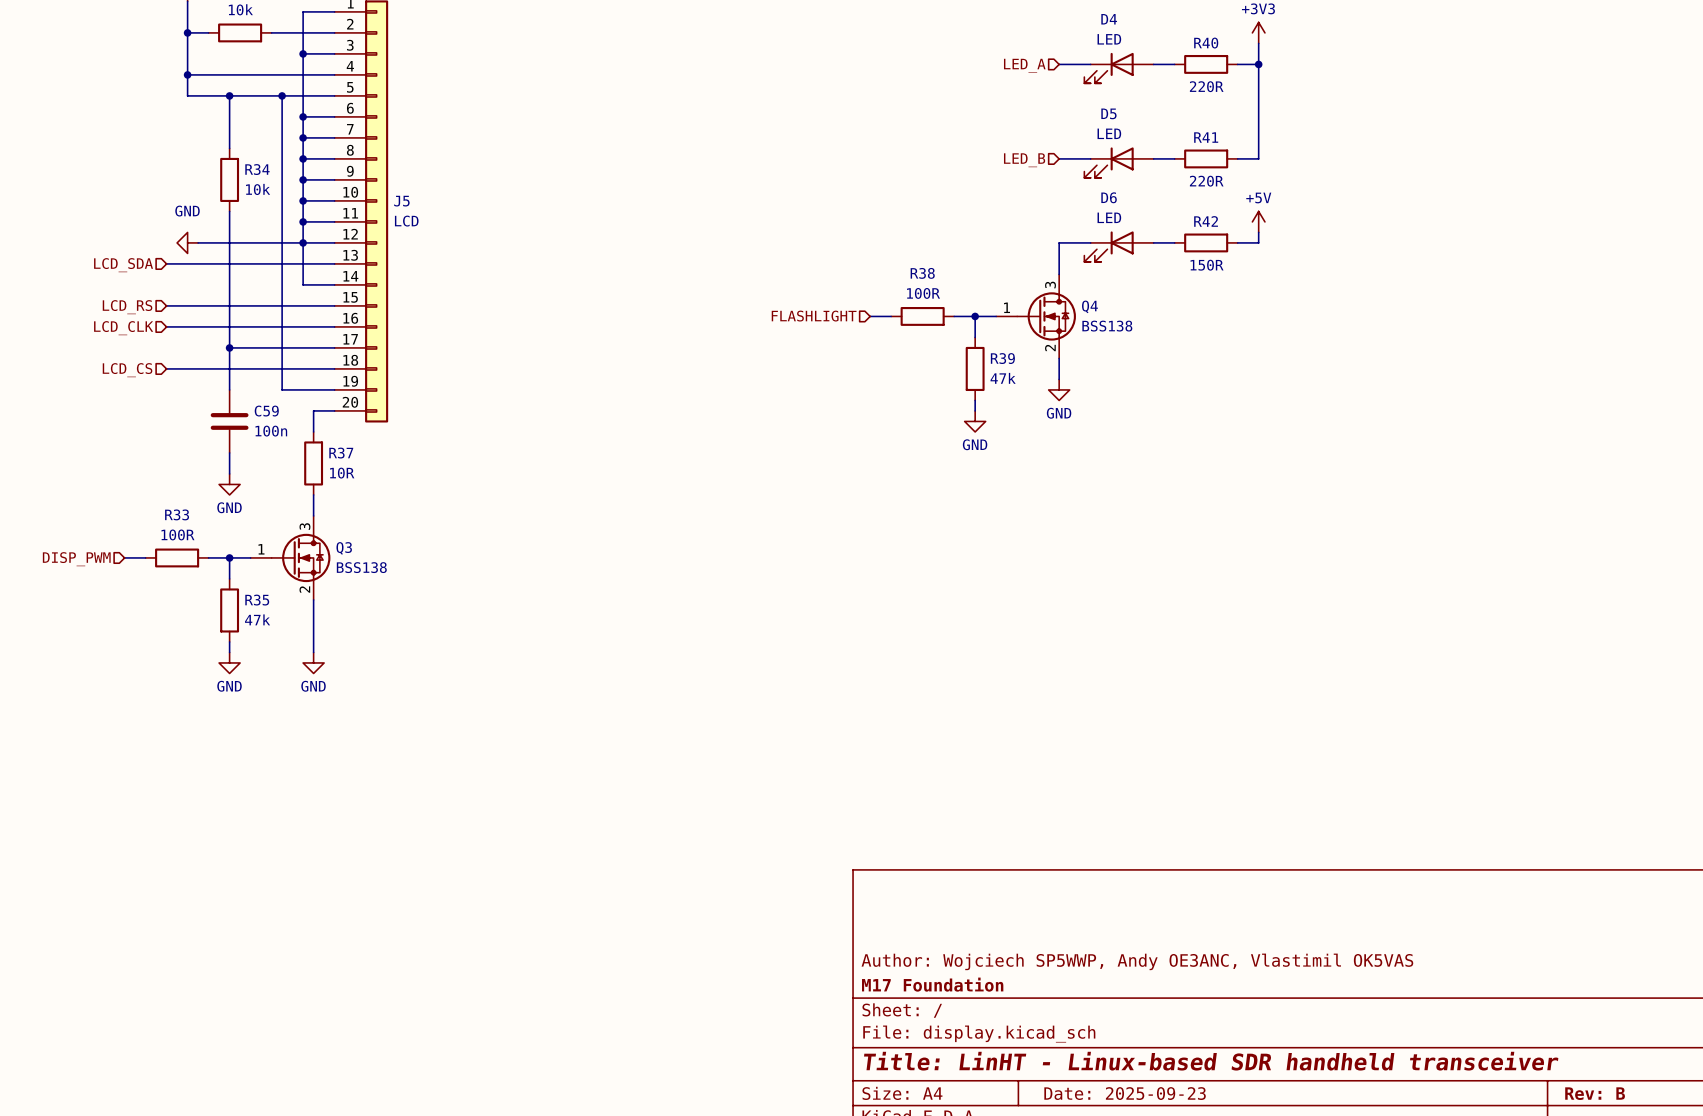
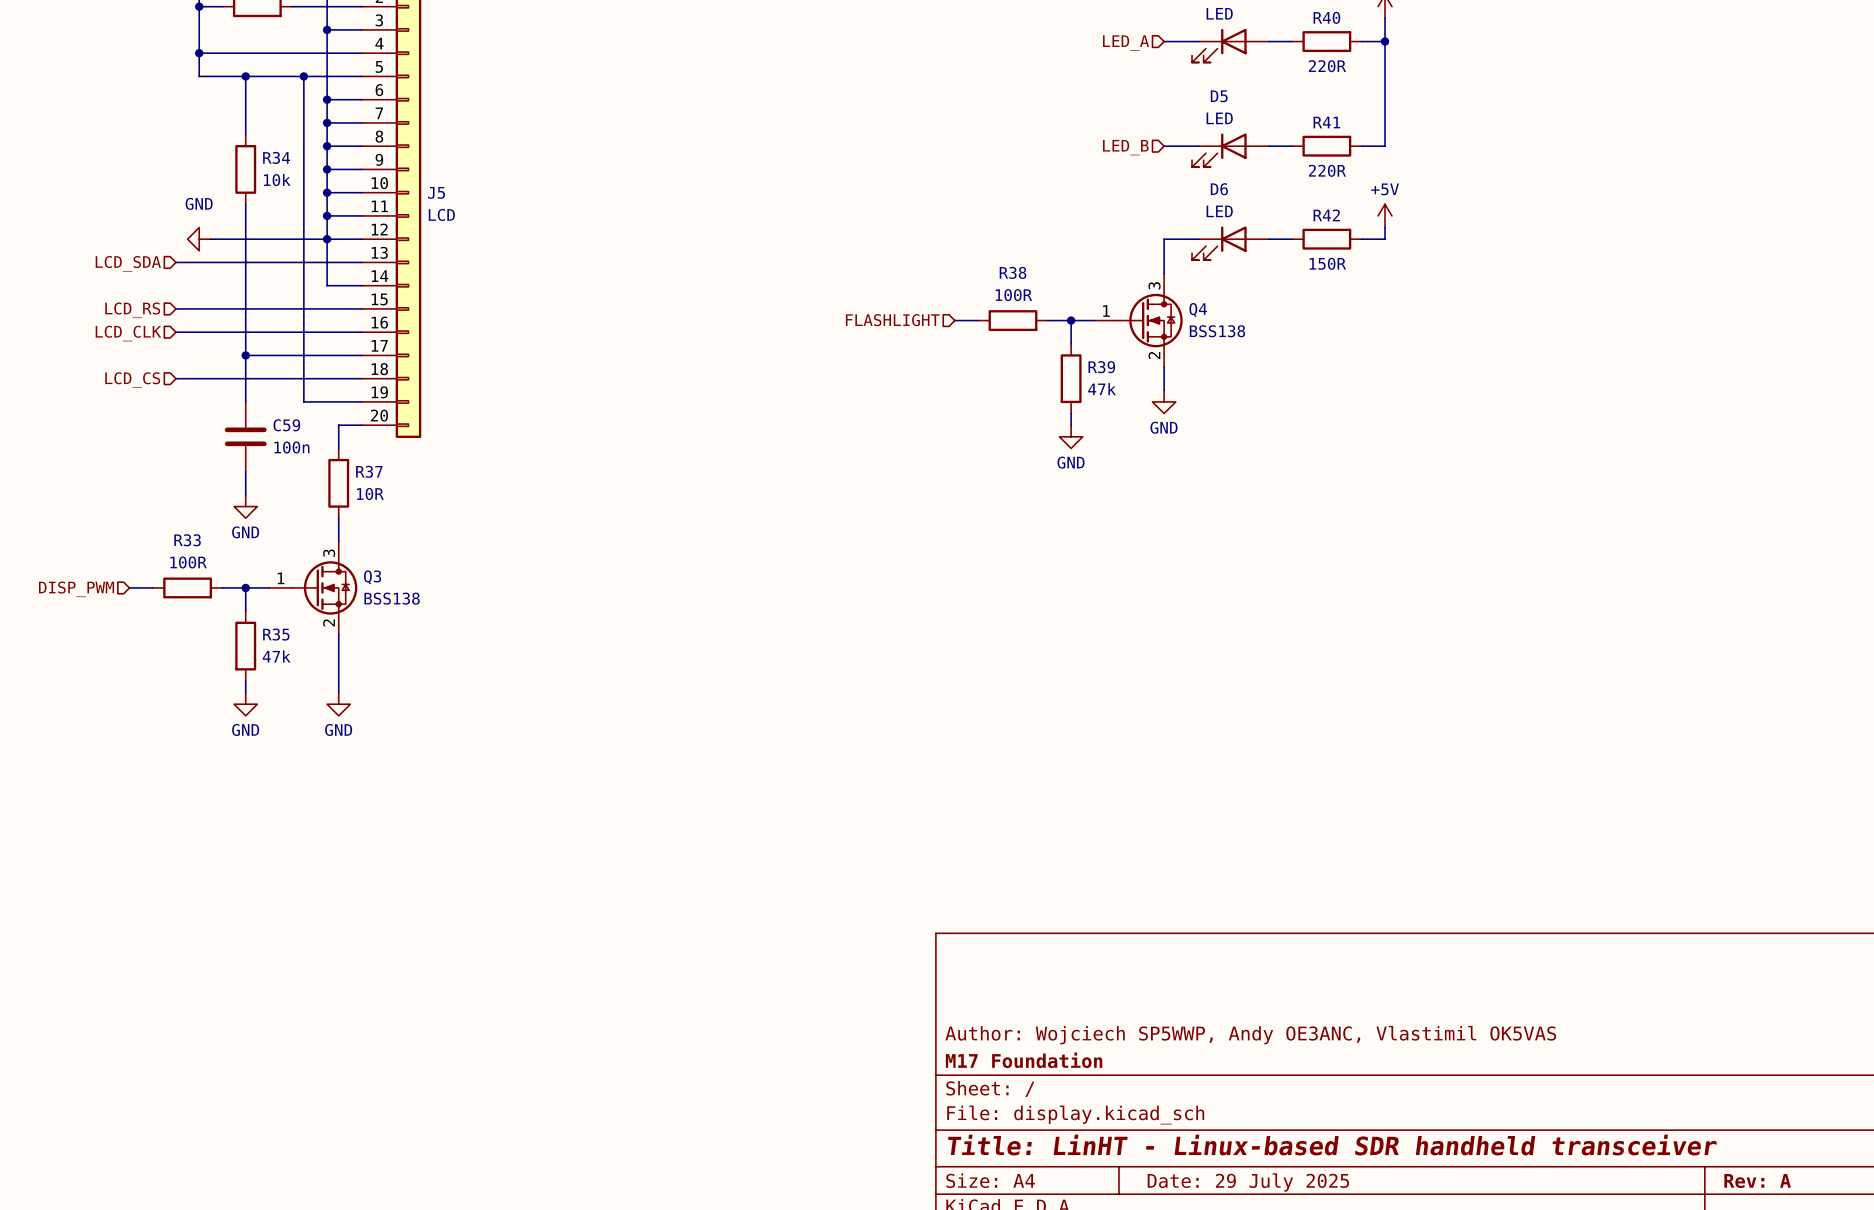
title block: Date: 2025-09-23 (1125, 1093) -> Date: 29 July 2025 (1248, 1182)
title block: Rev: B (1595, 1093) -> Rev: A (1757, 1181)

